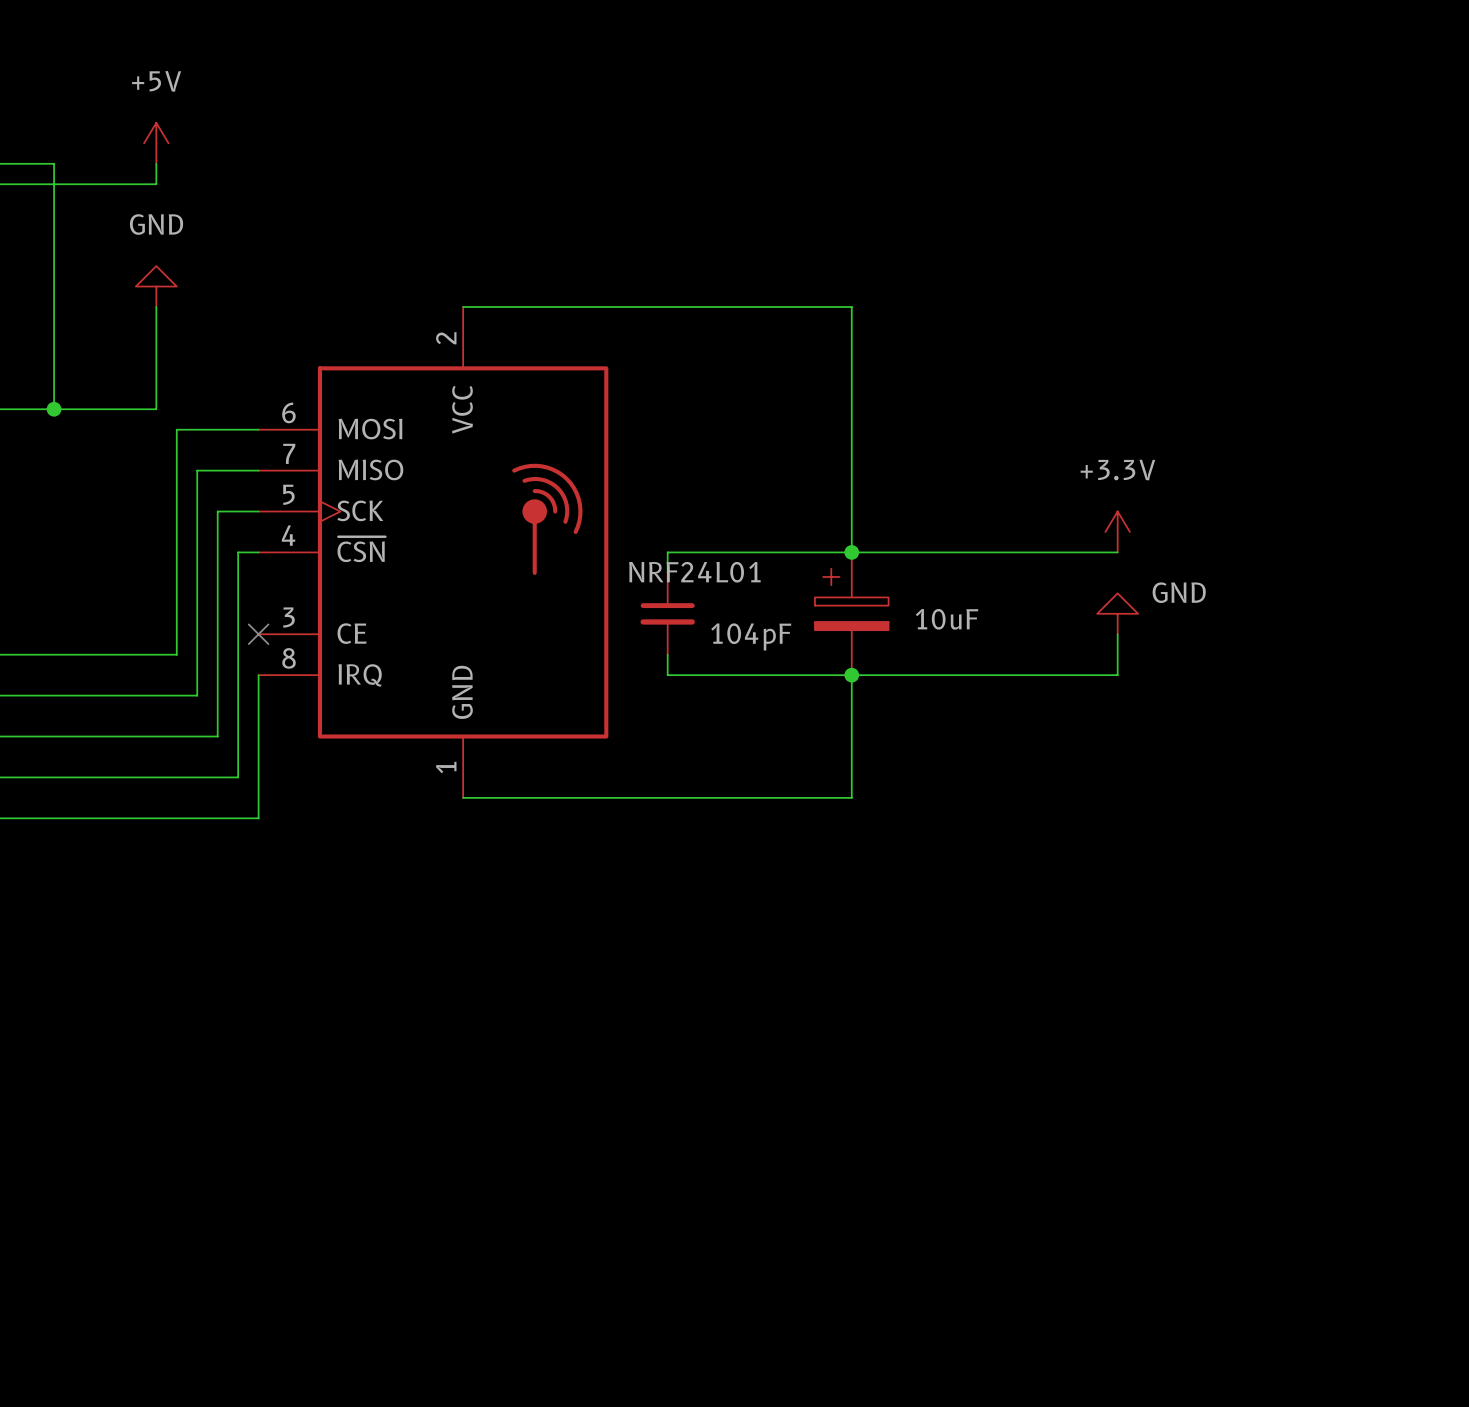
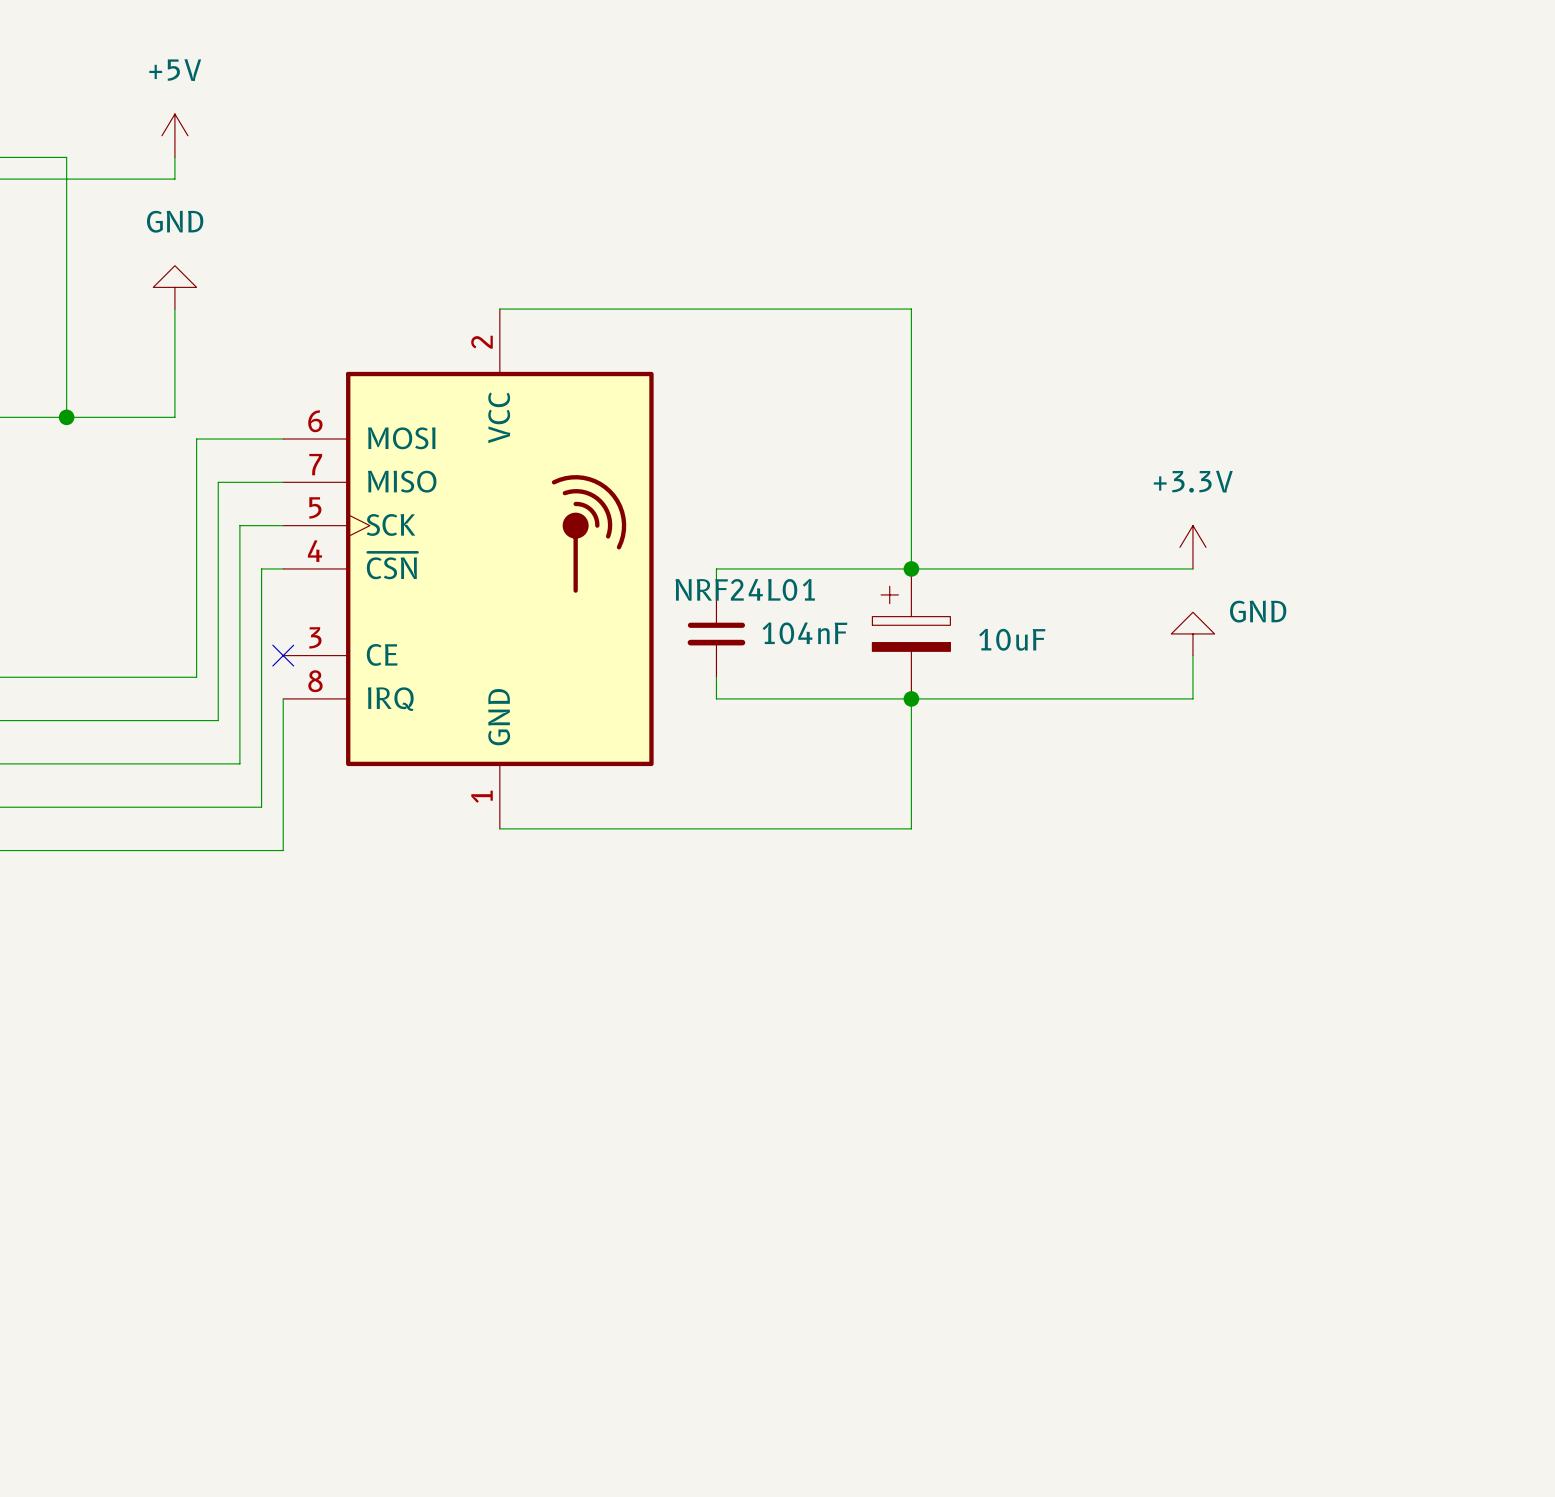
part value: 104pF (751, 636) -> 104nF (804, 633)

